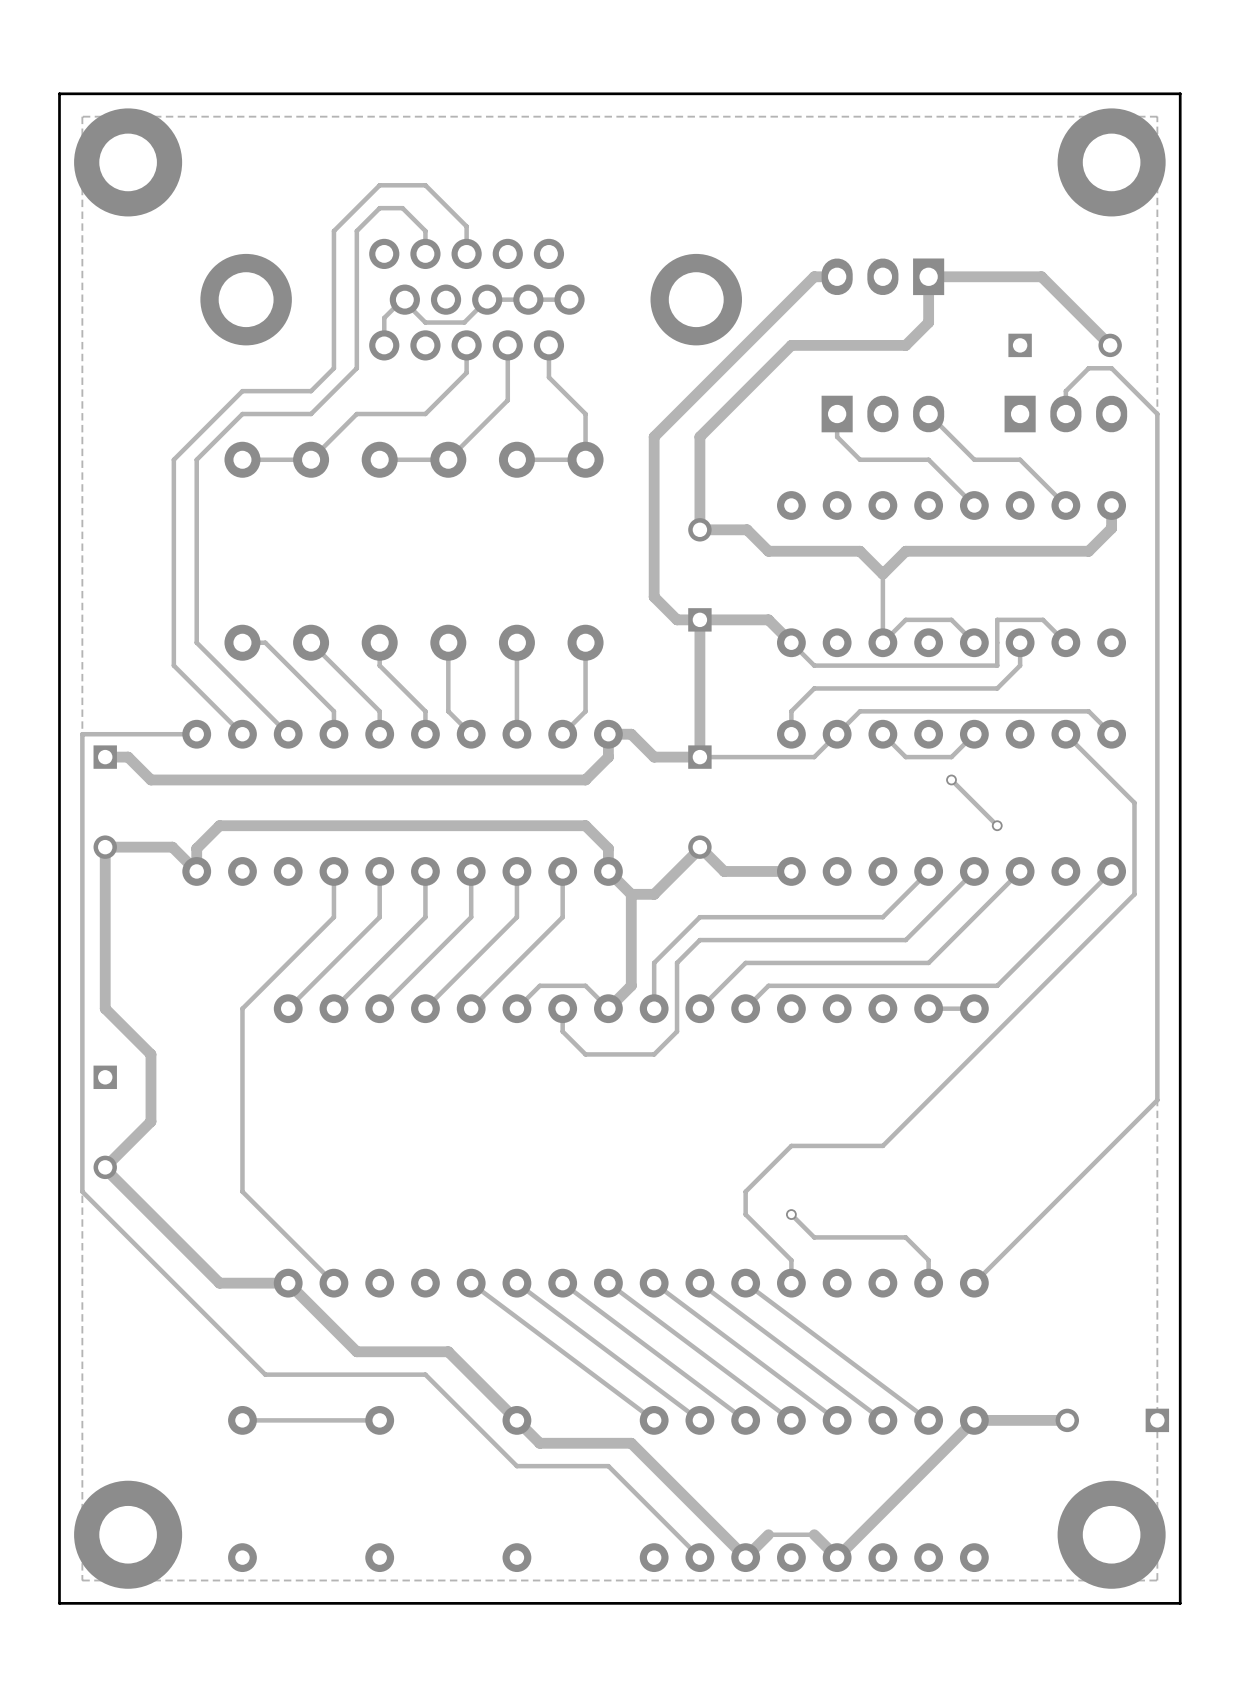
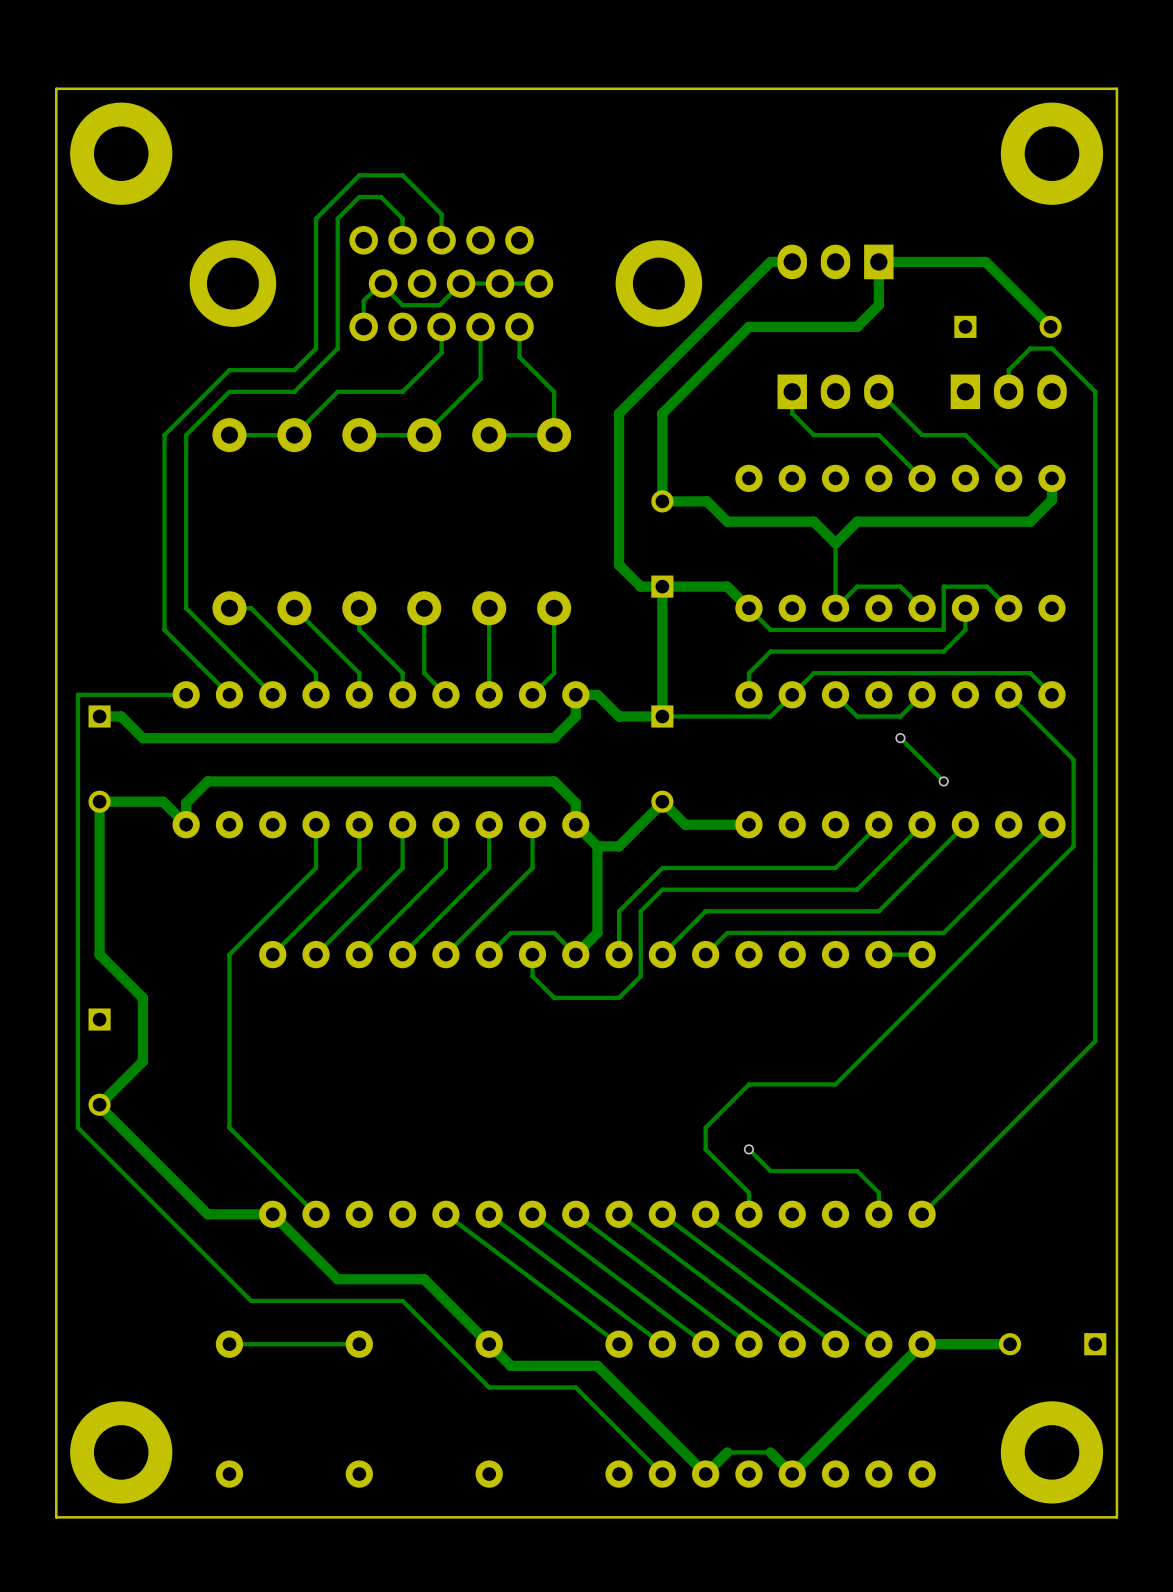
zone outline: (1157, 116) (1157, 1580) (82, 1580) (82, 116) (1157, 116) -> none

